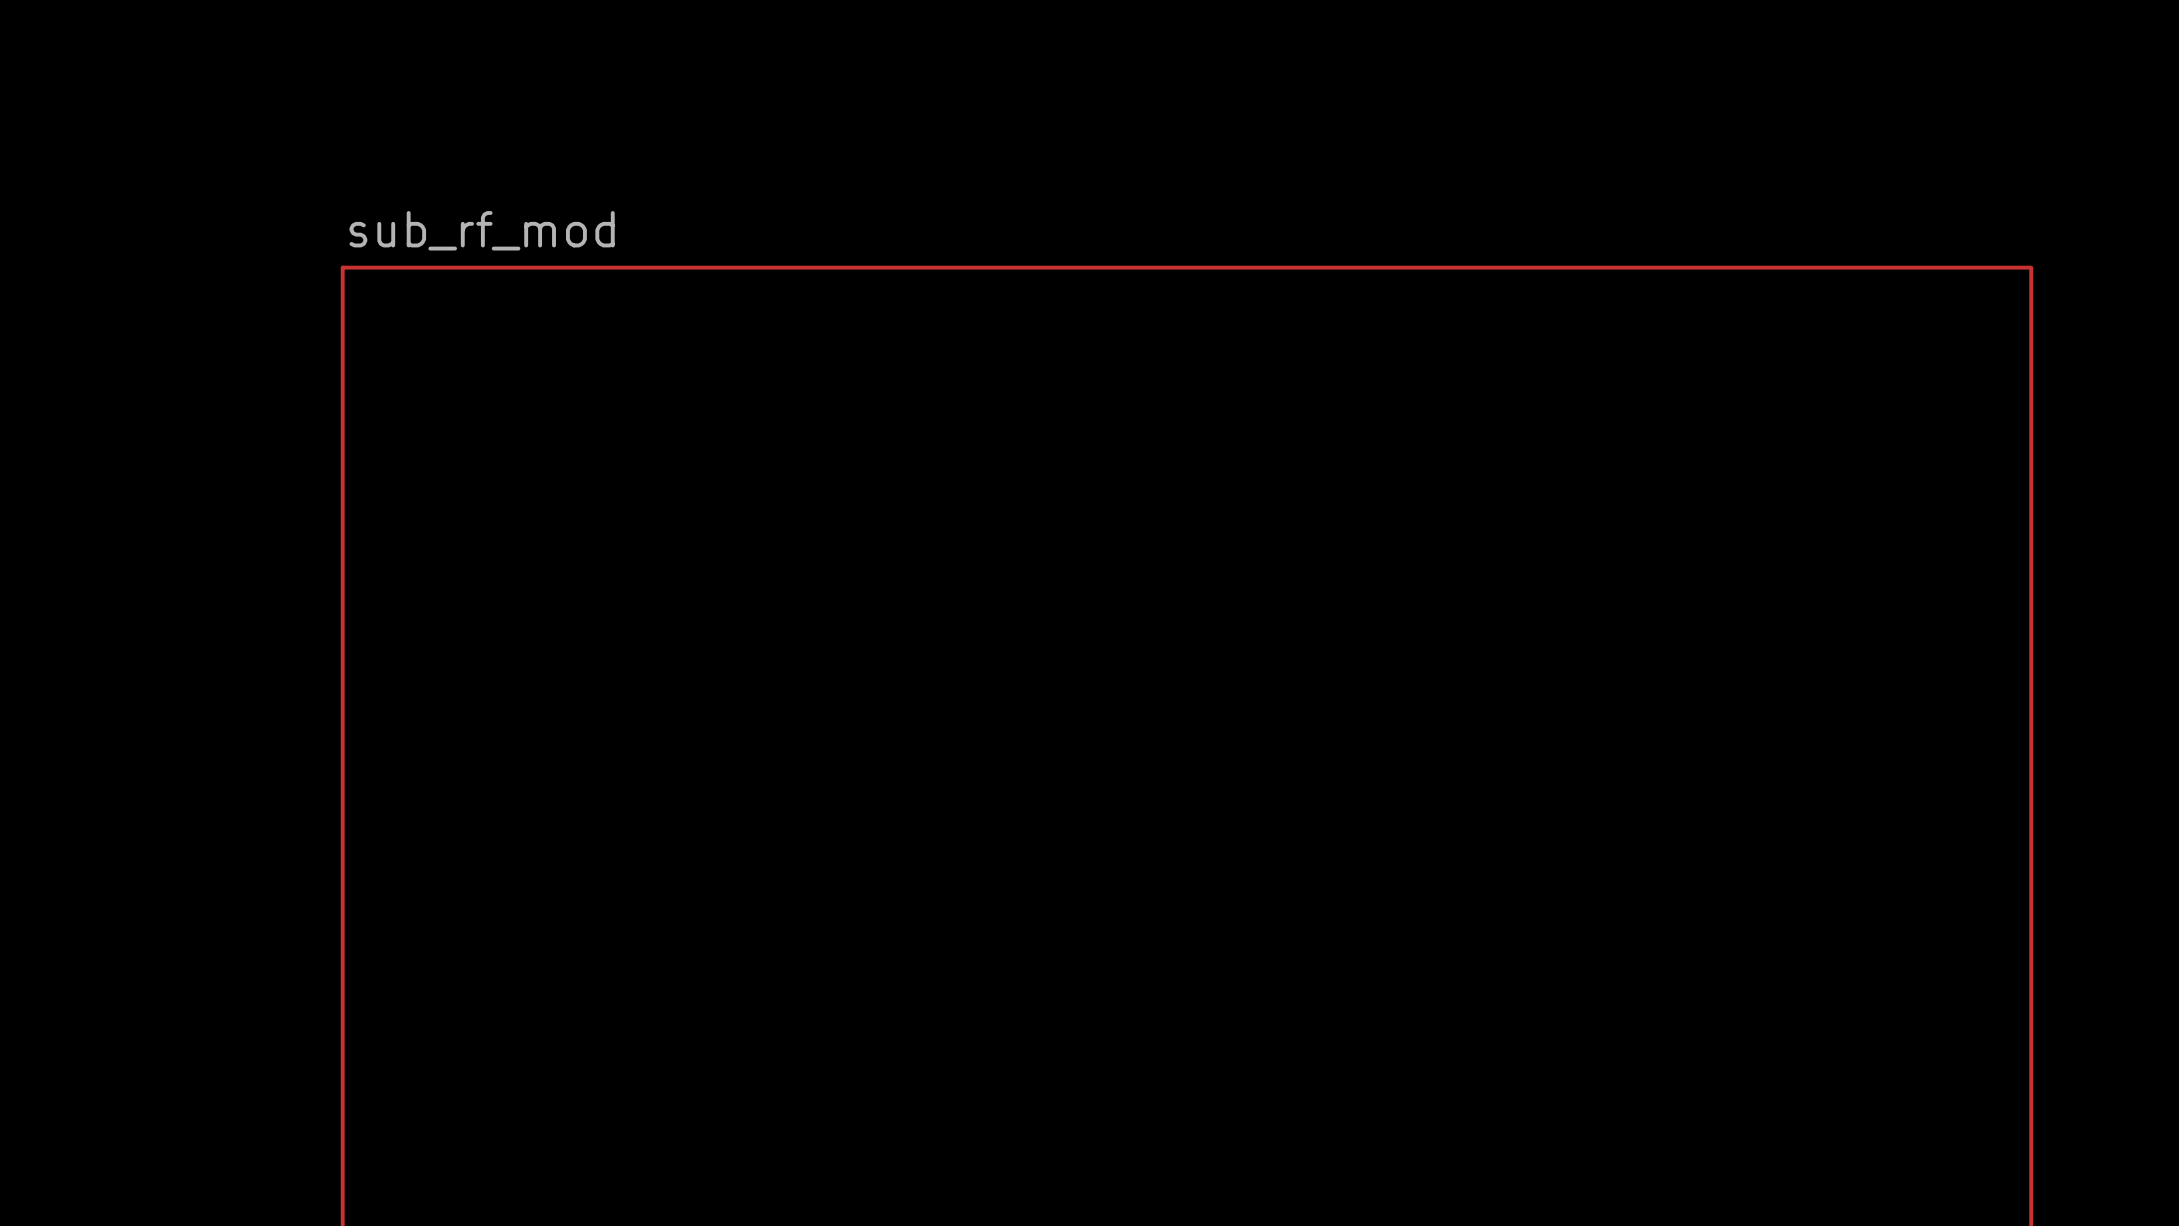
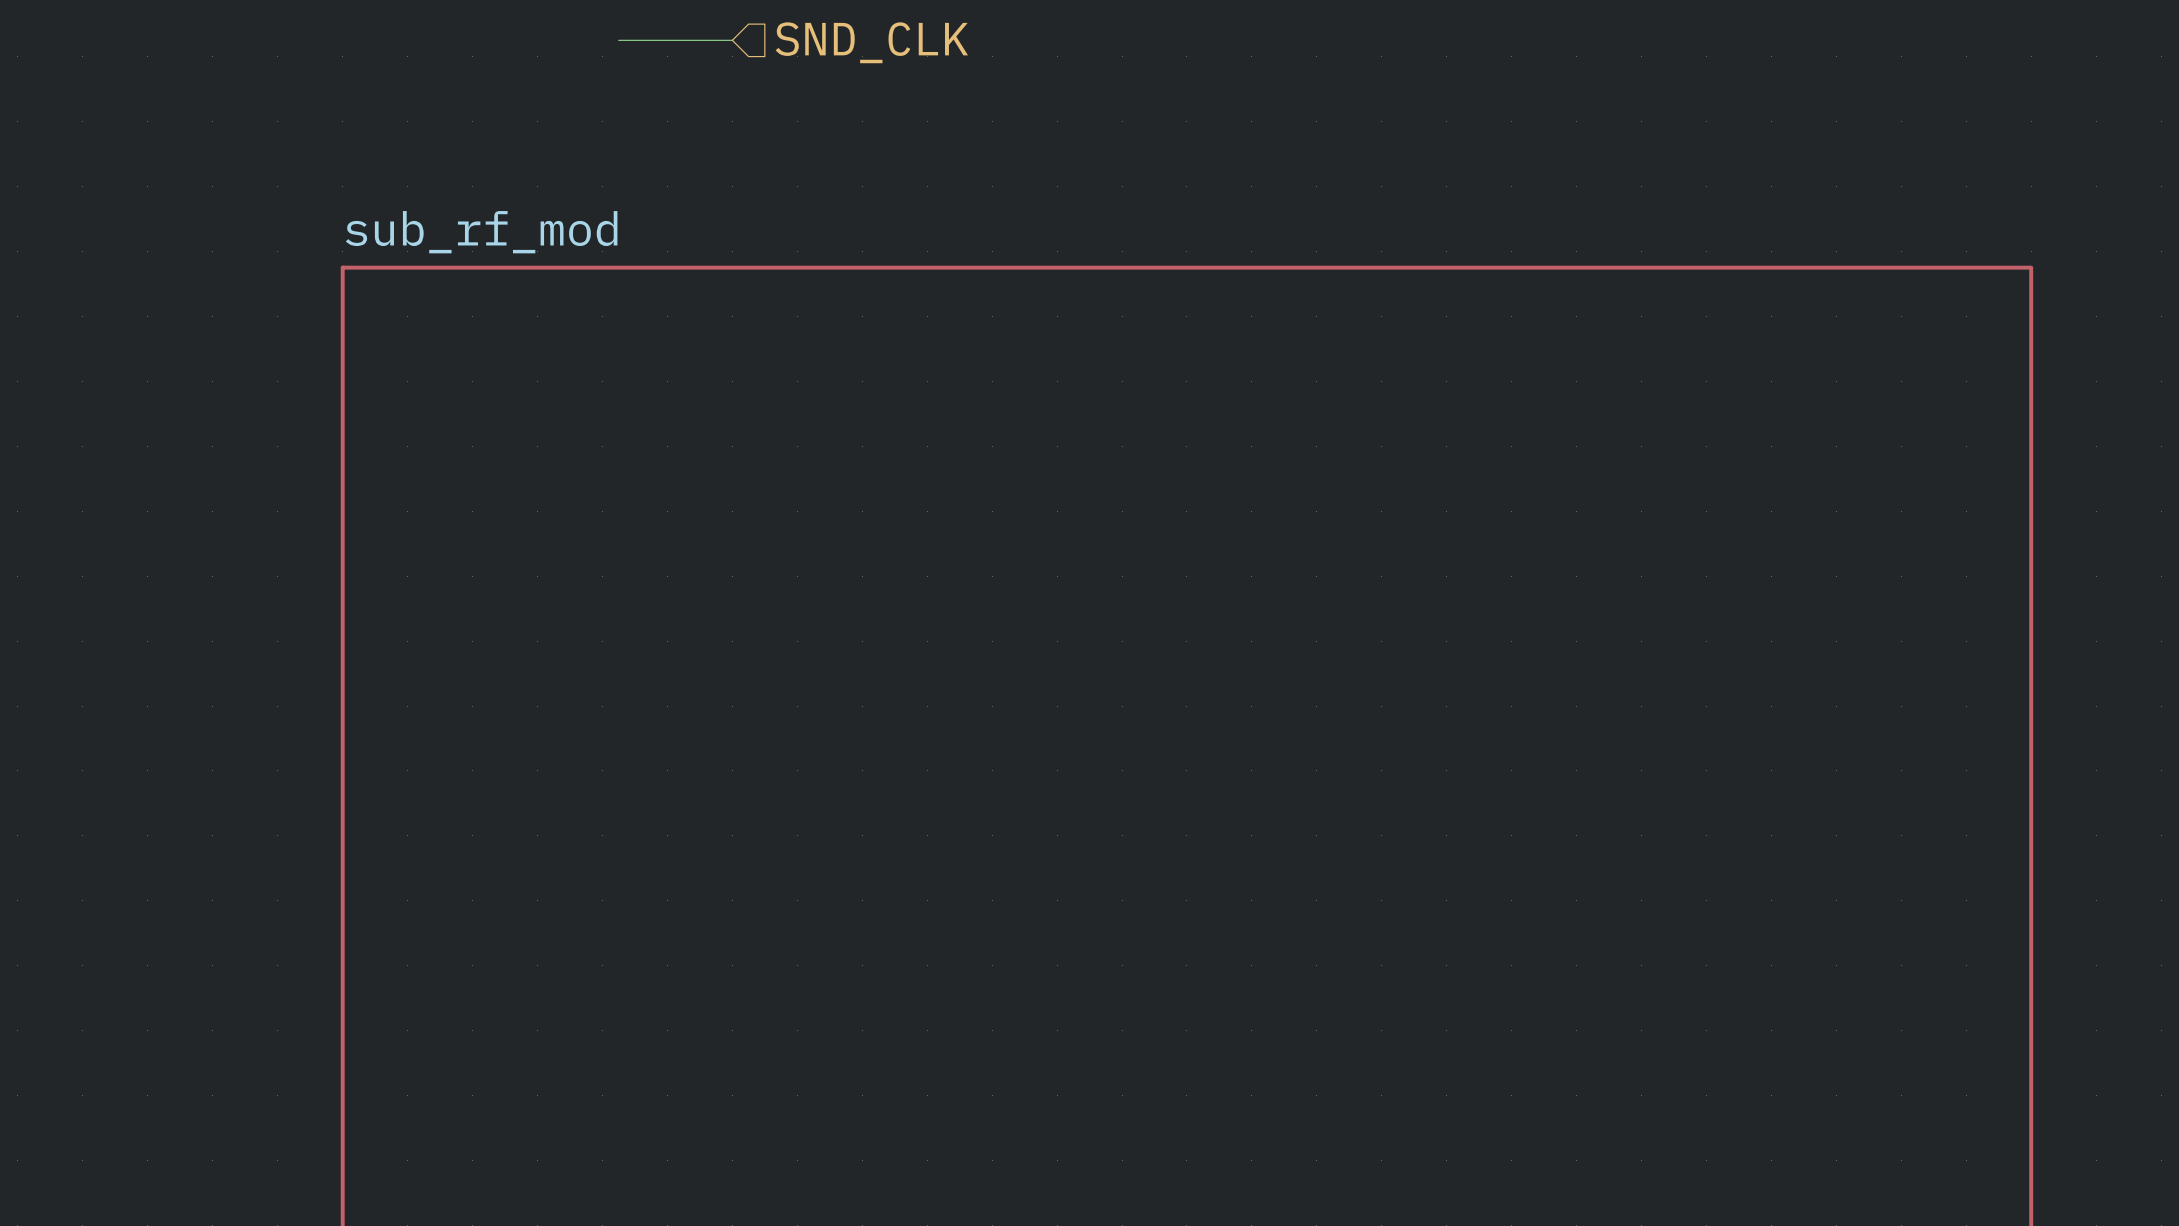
wire: none -> (618, 40) (732, 40)
hierarchical label: none -> SND_CLK (871, 42)

